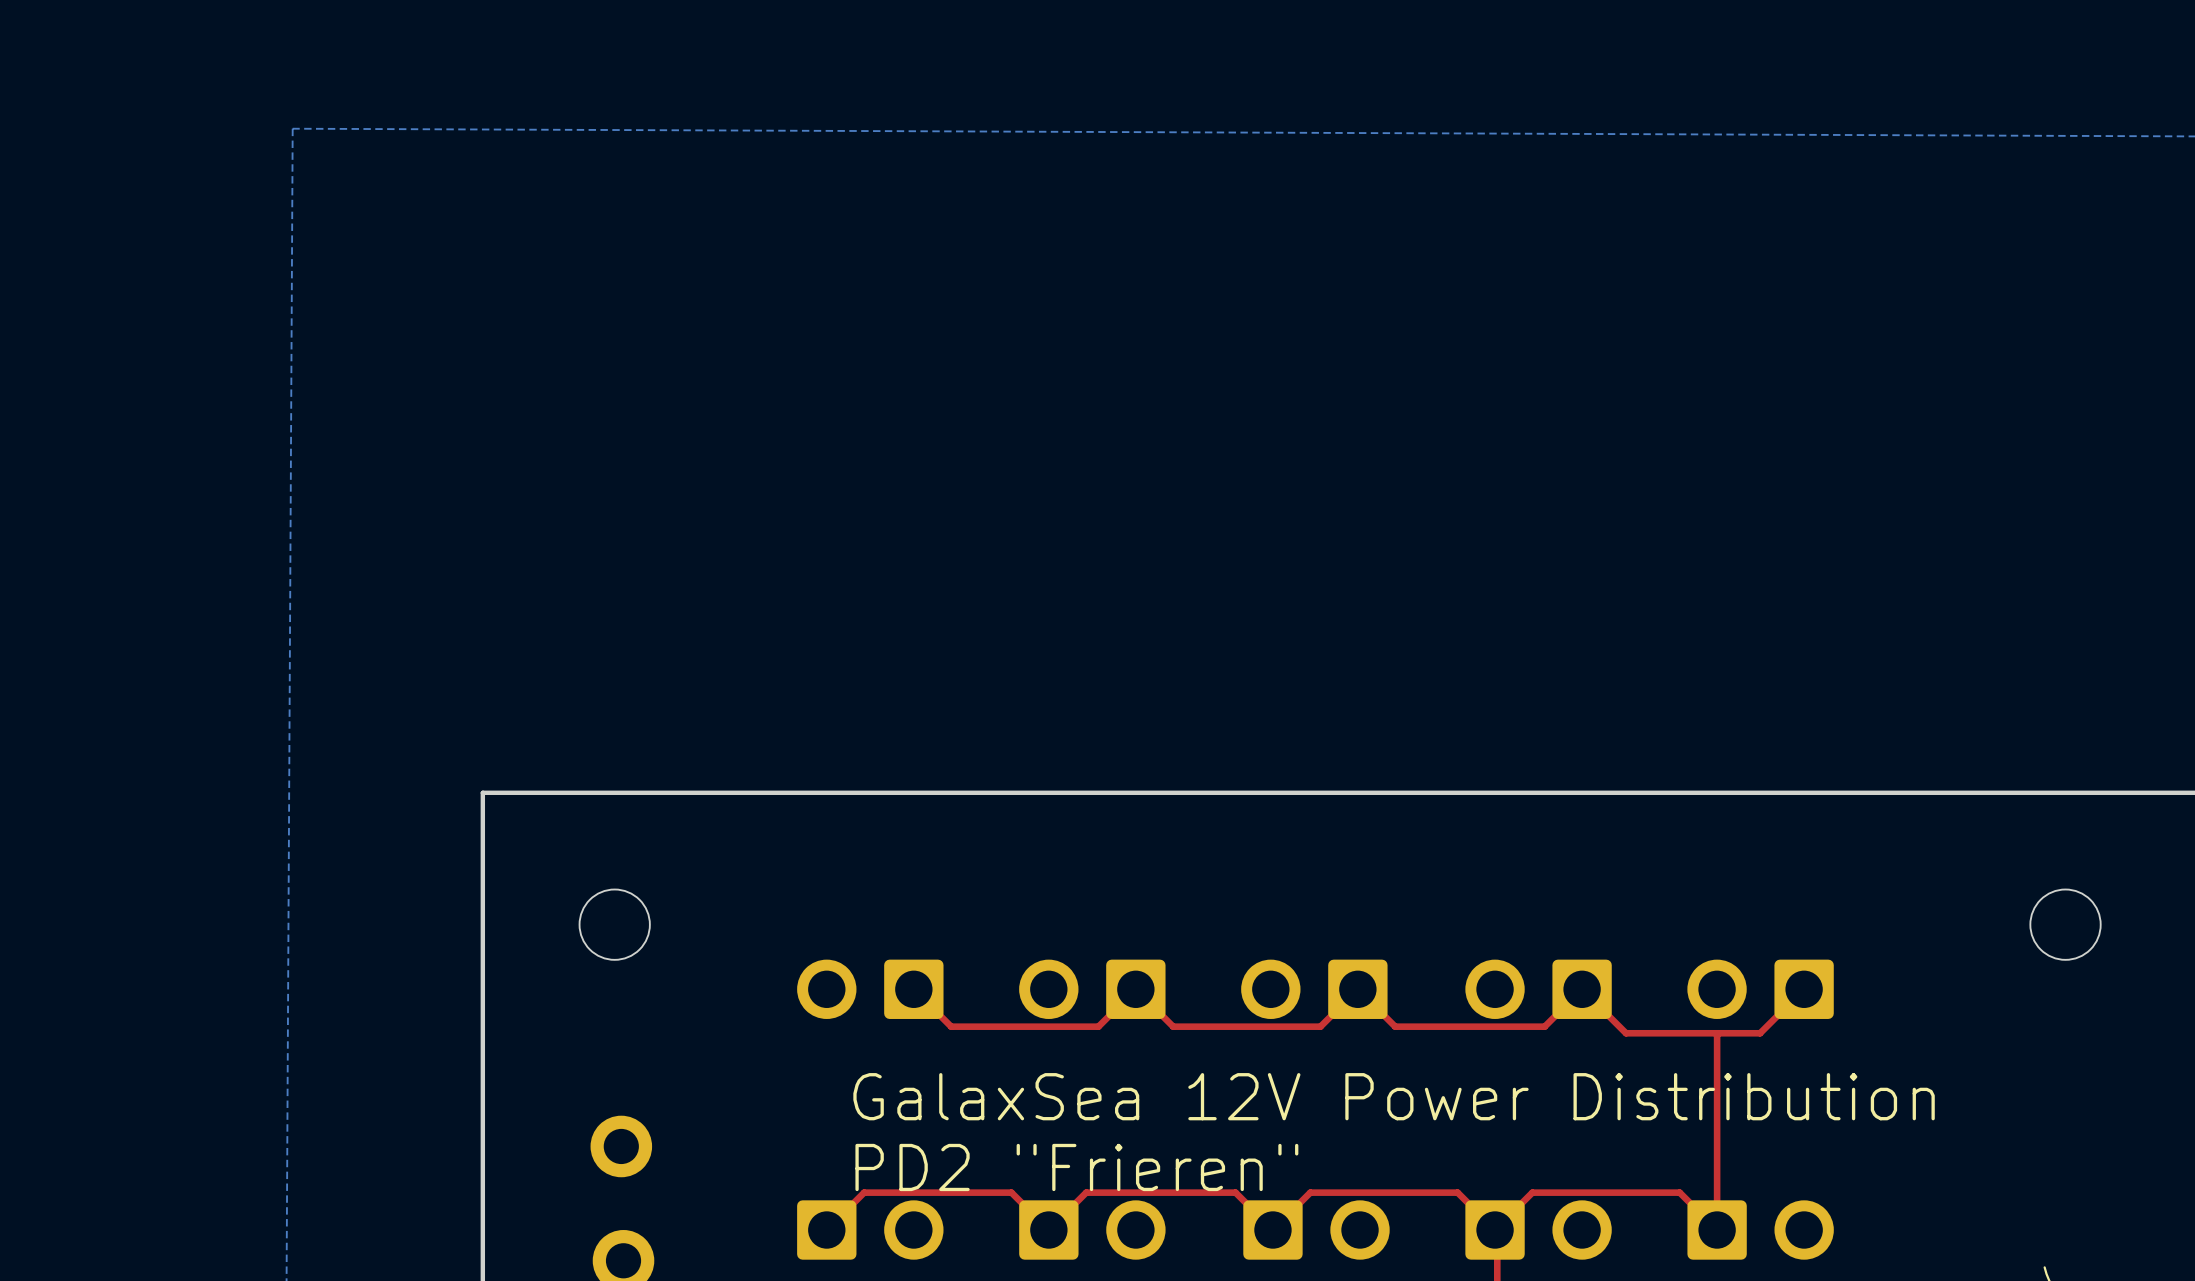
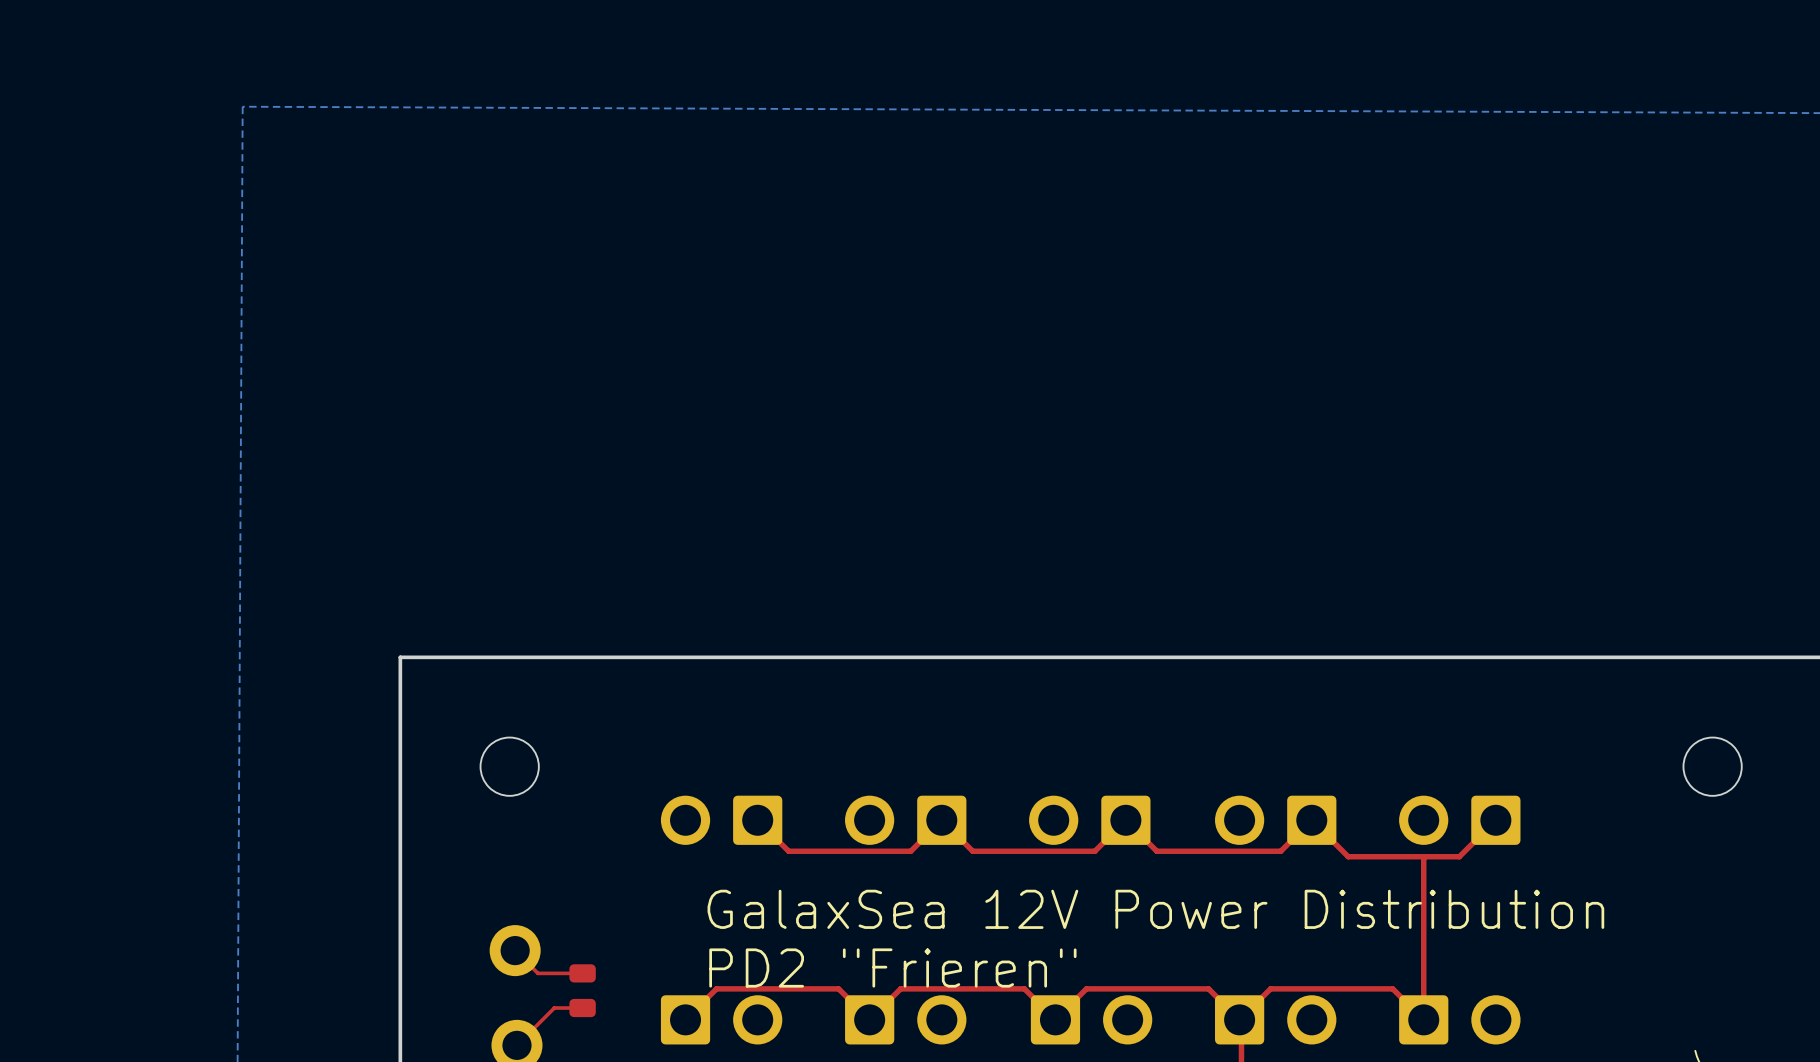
top track: none -> (515, 950) (537, 973) (582, 973)
part: none -> (582, 990)
top track: none -> (582, 1008) (554, 1008) (516, 1045)

